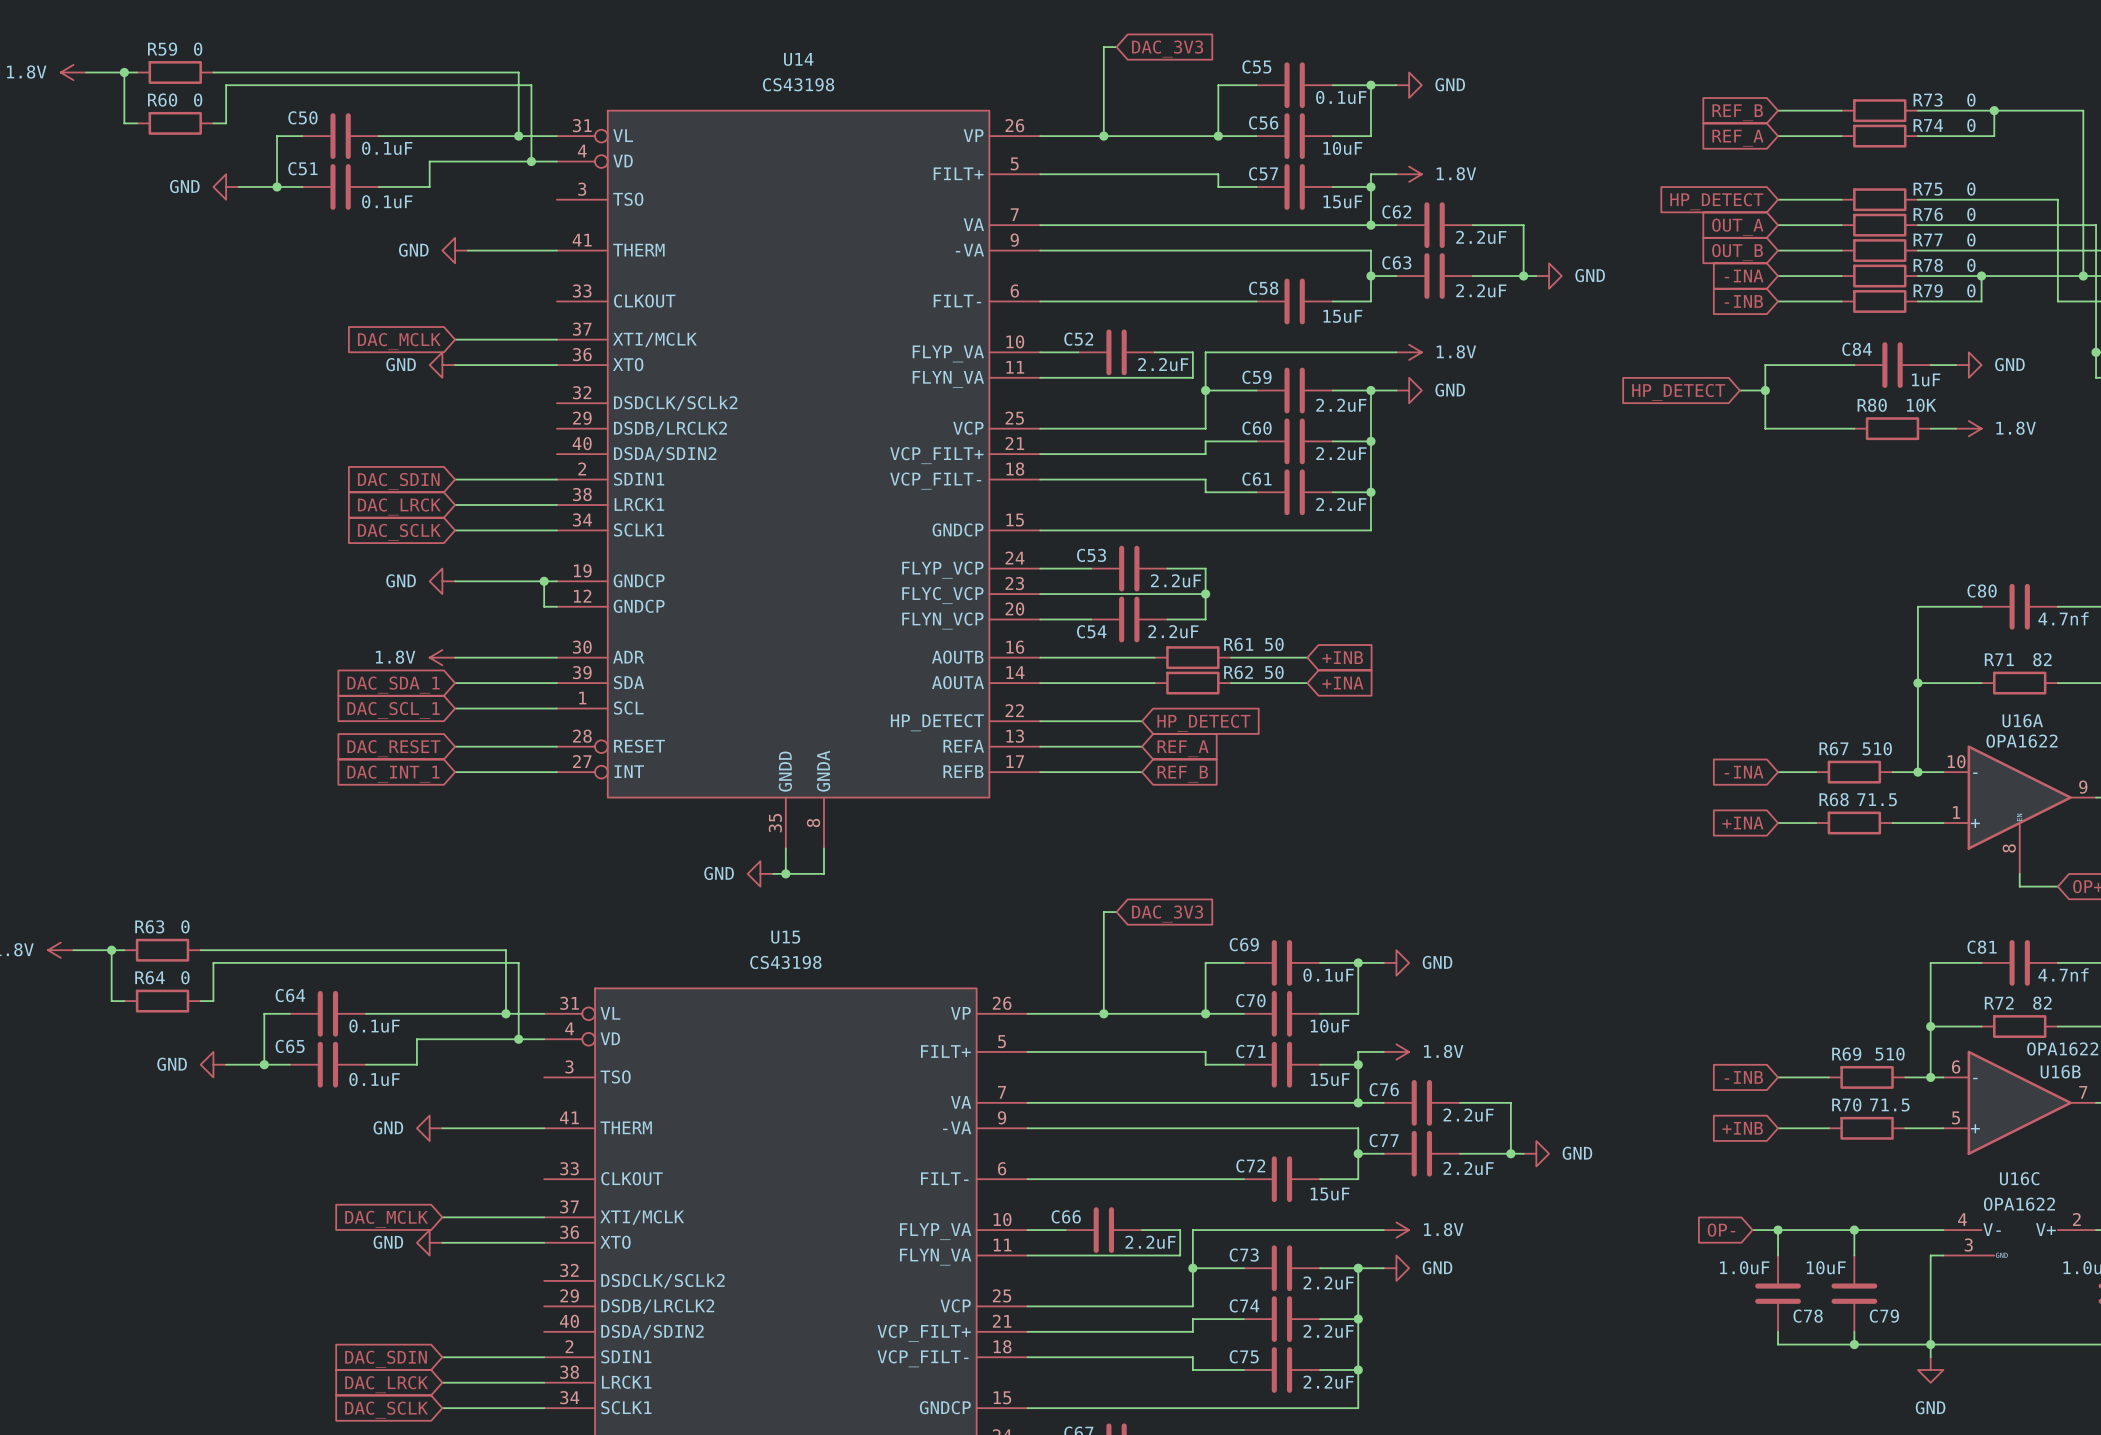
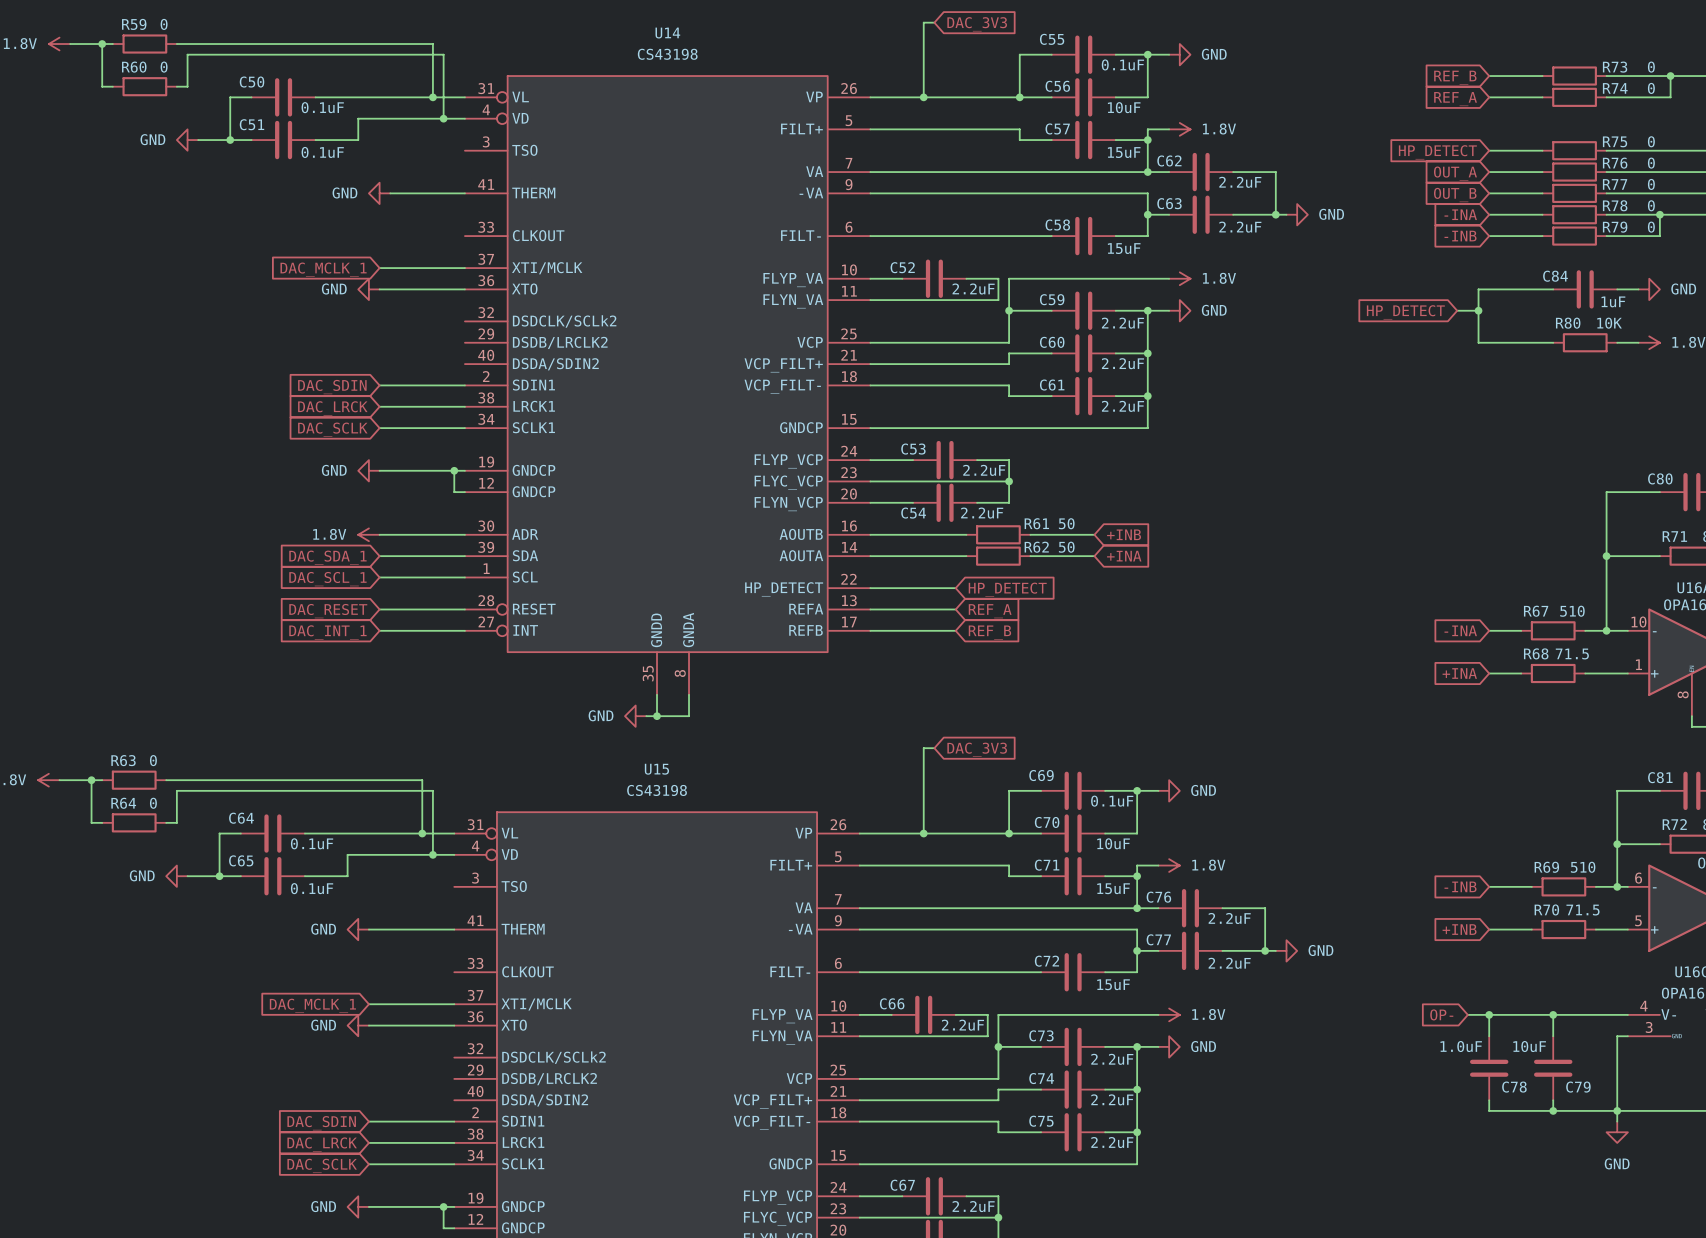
global label: DAC_MCLK (399, 341) -> DAC_MCLK_1 (323, 269)
global label: DAC_MCLK (386, 1219) -> DAC_MCLK_1 (312, 1005)

